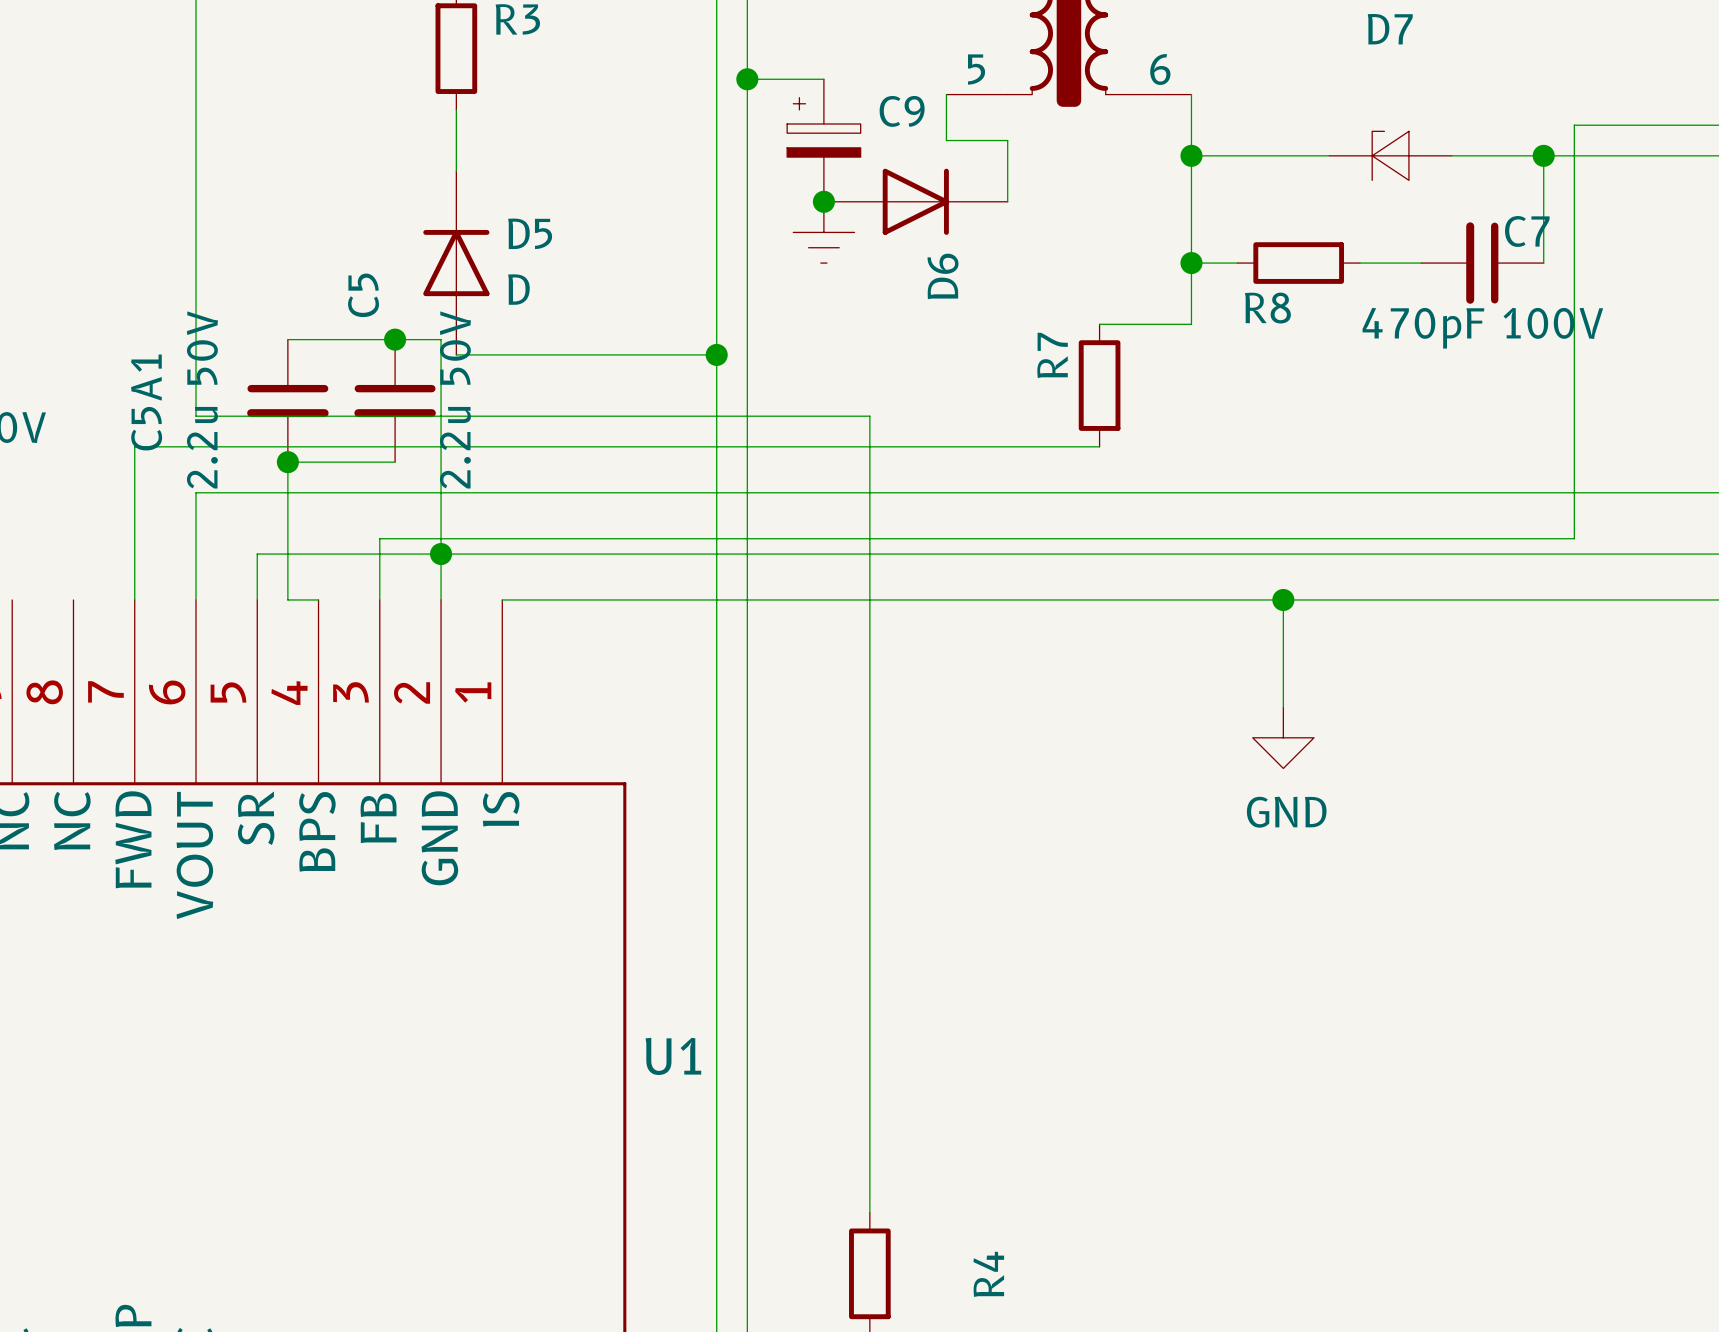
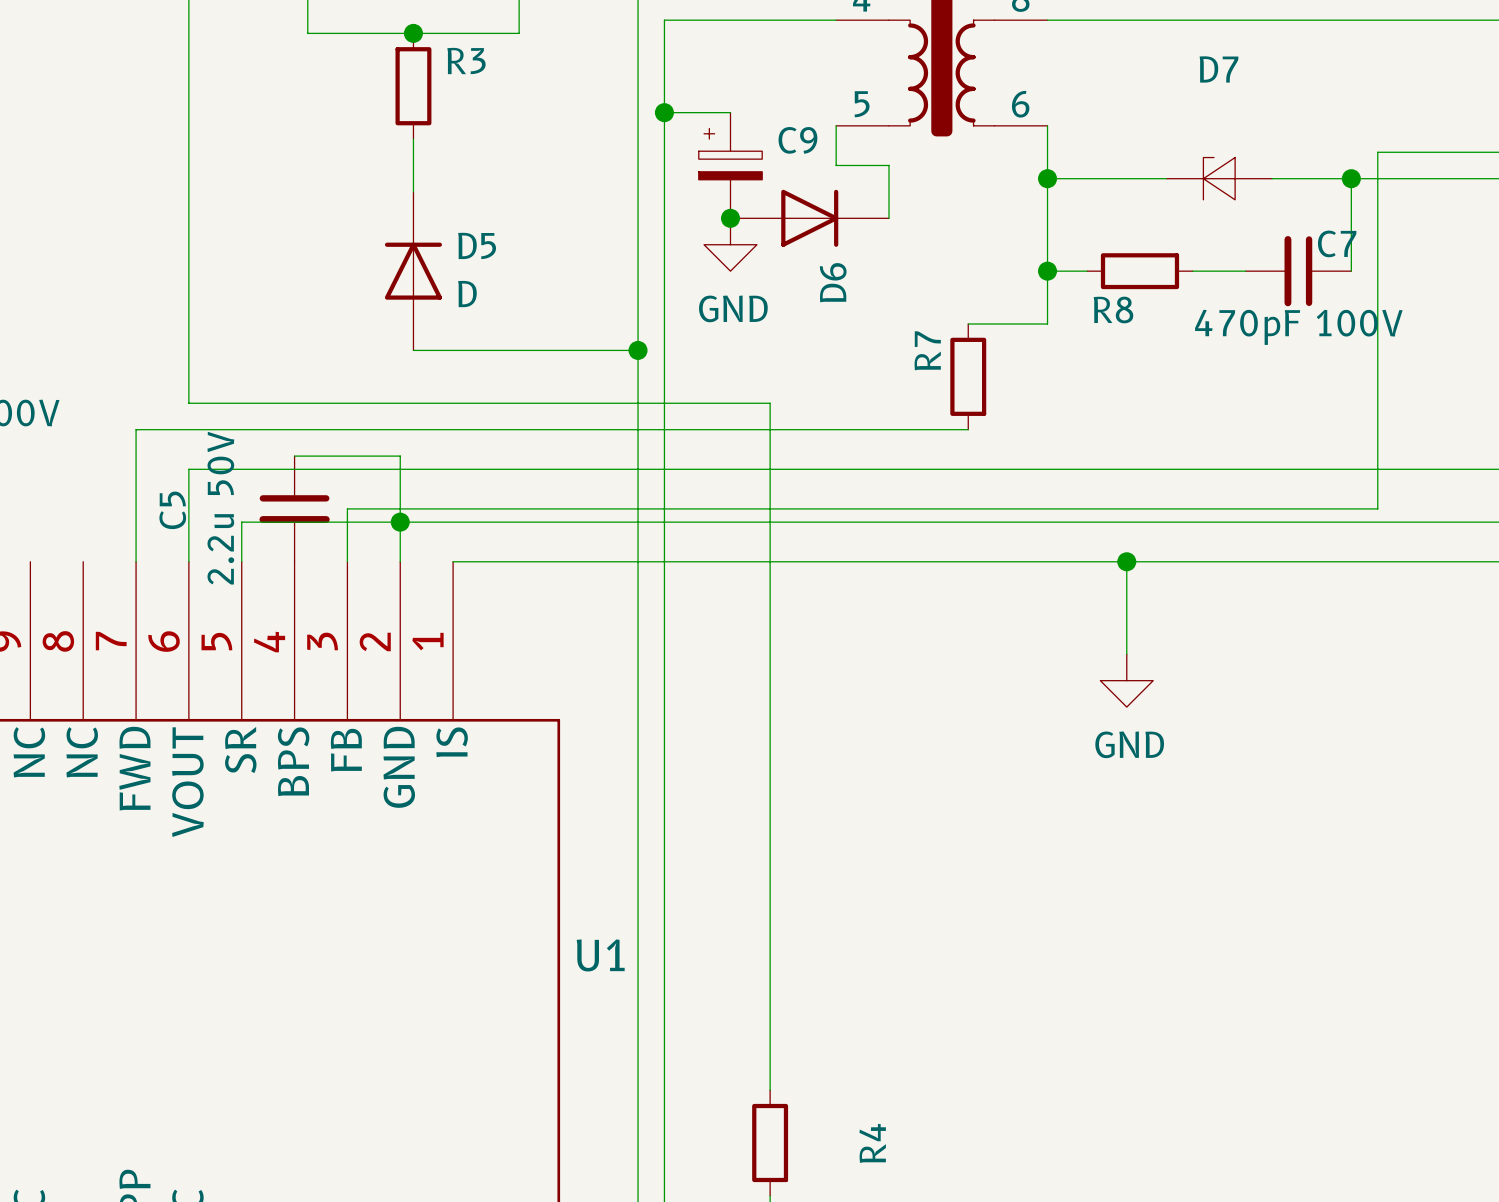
power symbol shape: [793, 201, 855, 264] -> [704, 218, 757, 272]
C5 name position: C5 (363, 295) -> C5 (172, 510)
power symbol text: none -> GND (733, 308)
wire: (287, 339) (441, 339) (441, 477) -> (294, 456) (400, 456)
junction: (395, 339) -> none
C5 value position: 2.2u 50V (455, 399) -> 2.2u 50V (220, 508)
C5A1: 2.2u 50V (287, 400) -> none
C5 position: (395, 400) -> (294, 508)
junction: (287, 462) -> none
wire: (395, 462) (287, 462) (287, 599) (318, 599) -> none

